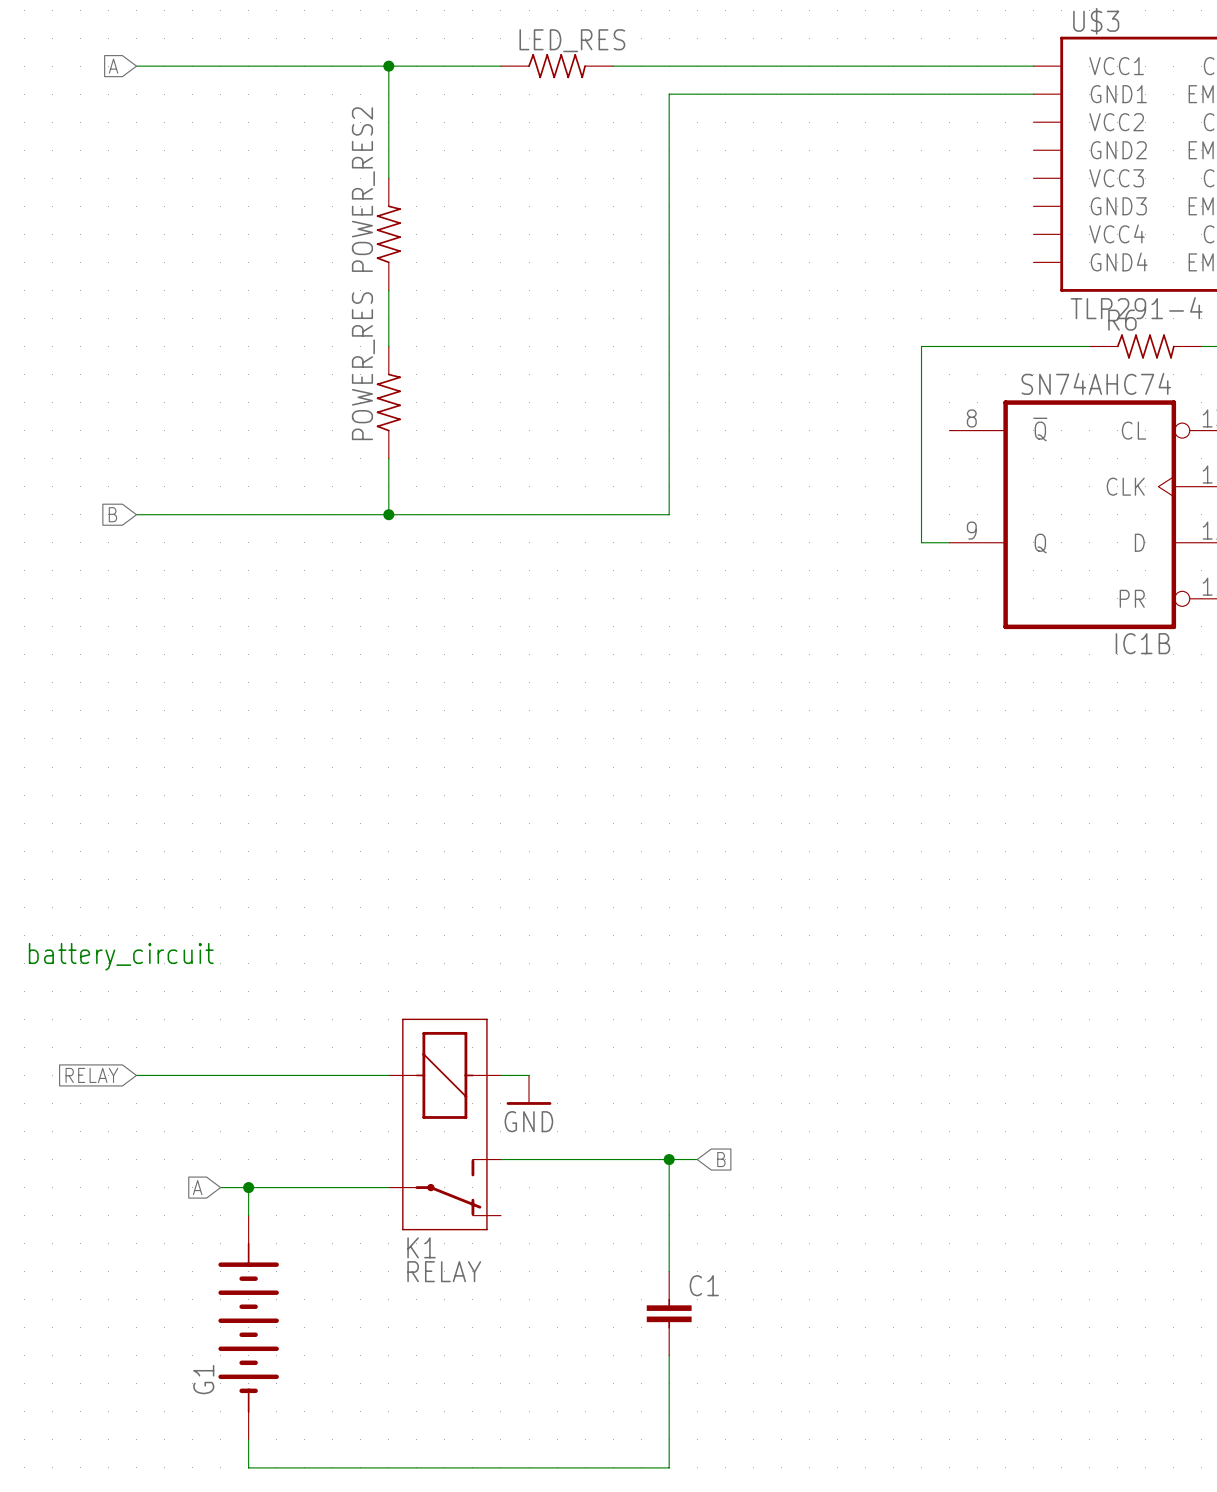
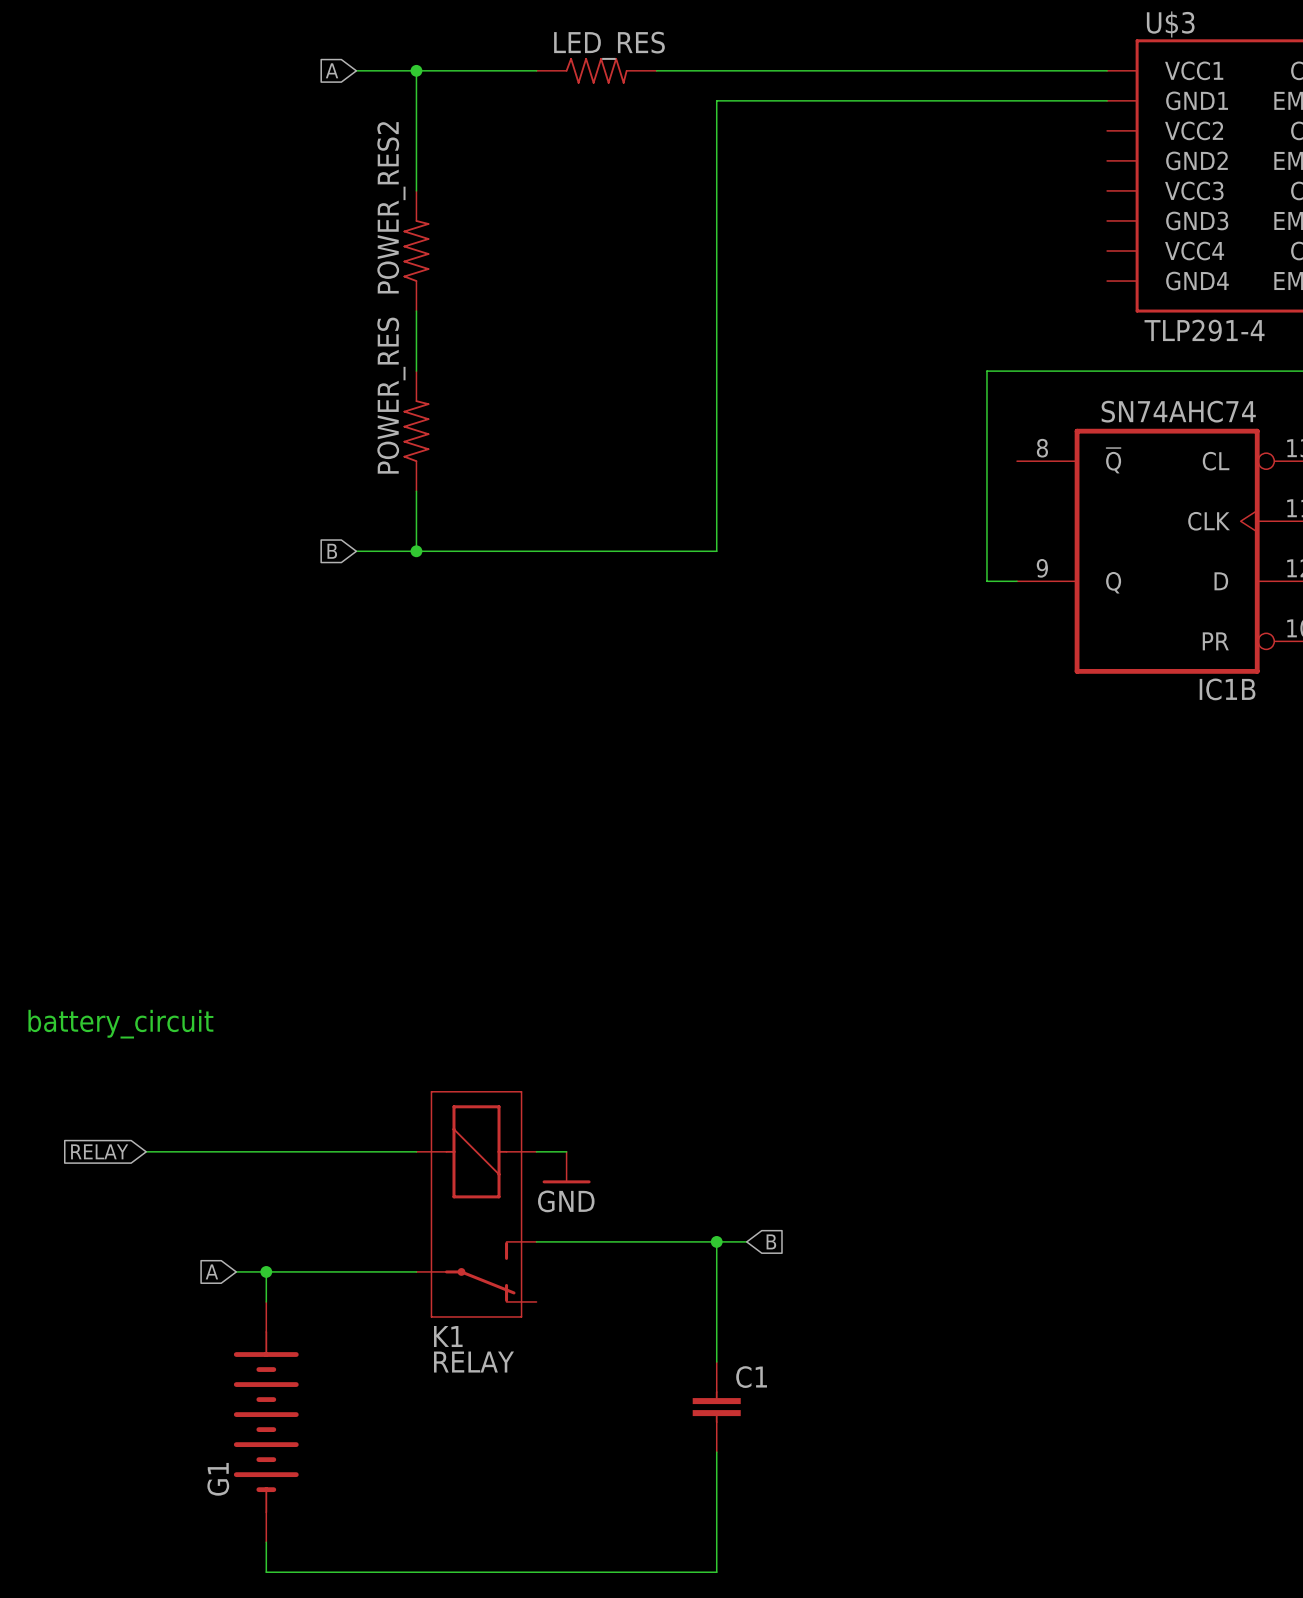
global label position: A (113, 66) -> A (332, 70)
wire: (136, 66) (332, 66) -> none
R6: (1145, 346) -> none
global label position: B (112, 514) -> B (332, 551)
wire: (136, 514) (332, 514) -> none

